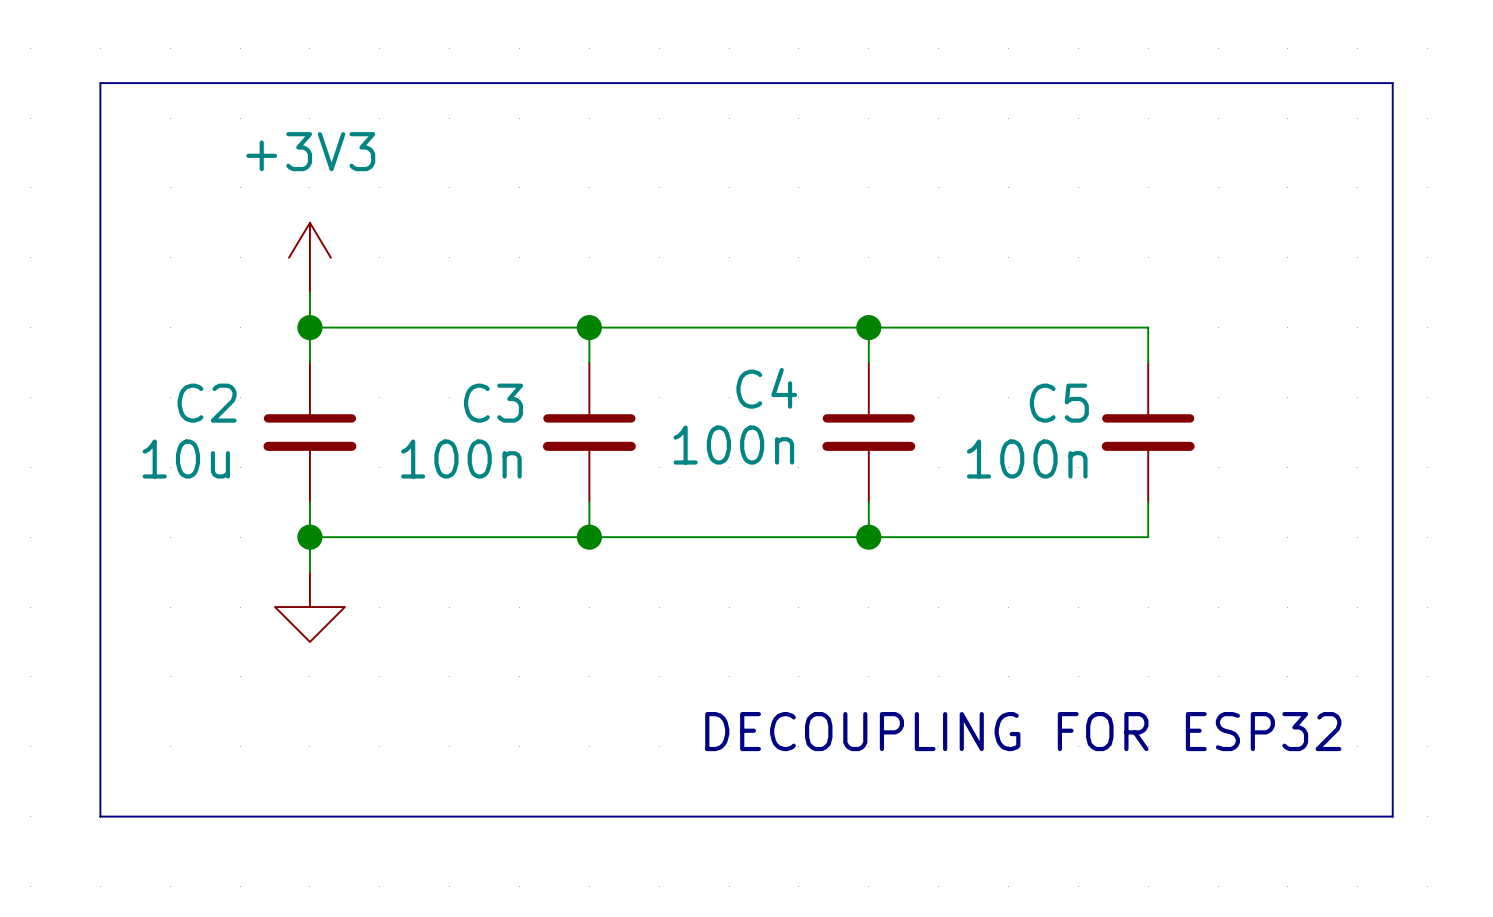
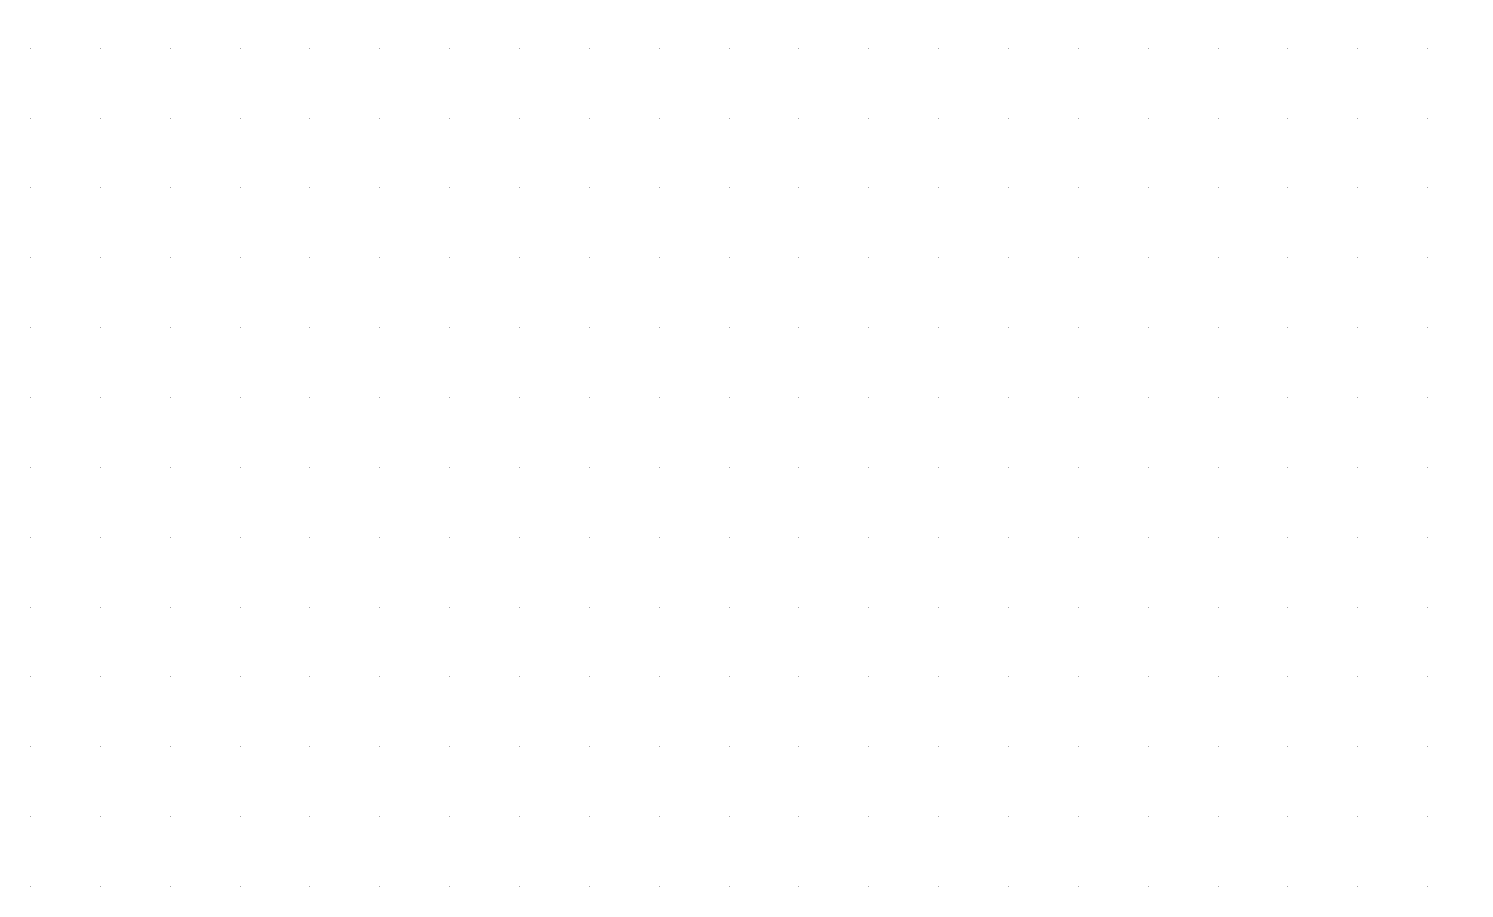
line: (100, 83) (1392, 83) (1392, 816) (100, 816) (100, 83) -> none
power symbol: +3V3 (309, 257) -> none
wire: (309, 292) (309, 362) -> none
wire: (309, 327) (1148, 327) (1148, 362) -> none
junction: (309, 327) -> none
wire: (589, 327) (589, 362) -> none
junction: (589, 327) -> none
wire: (868, 327) (868, 362) -> none
junction: (868, 327) -> none
C2: 10u (309, 432) -> none
C3: 100n (589, 432) -> none
C4: 100n (868, 432) -> none
C5: 100n (1148, 432) -> none
wire: (309, 502) (309, 572) -> none
wire: (589, 502) (589, 537) -> none
wire: (868, 502) (868, 537) -> none
wire: (1148, 502) (1148, 537) (309, 537) -> none
junction: (309, 537) -> none
junction: (589, 537) -> none
junction: (868, 537) -> none
power symbol: (309, 607) -> none
text: DECOUPLING FOR ESP32 (1023, 731) -> none

